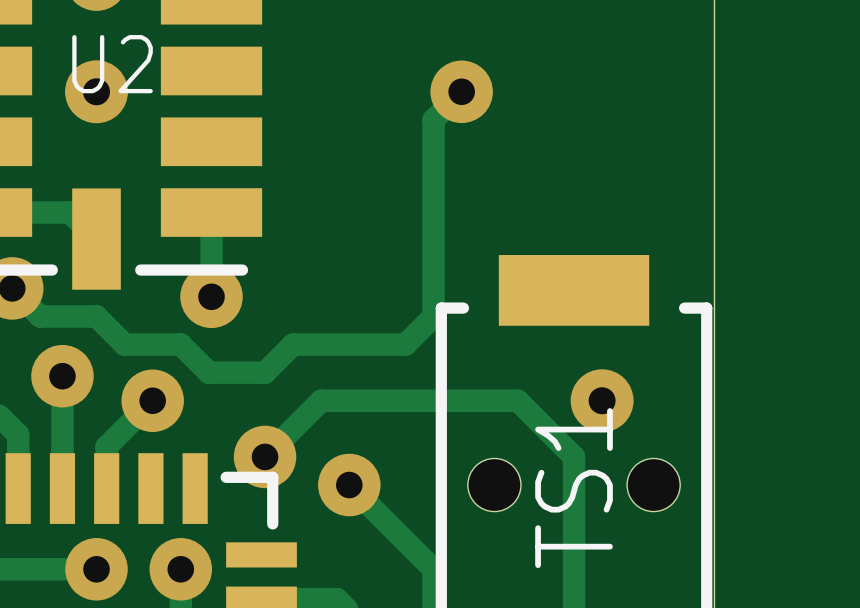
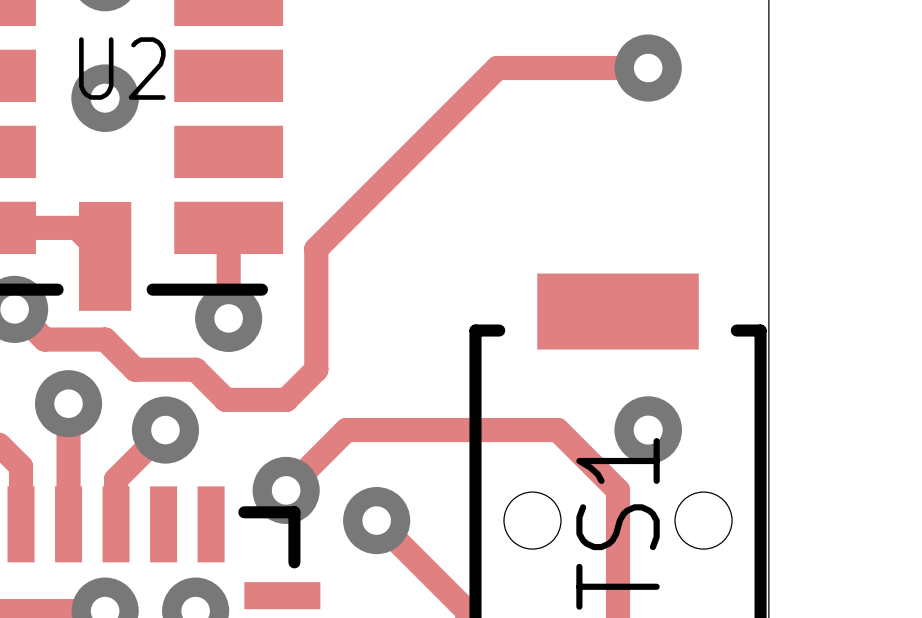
track: (461, 91) (433, 119) (433, 316) (405, 344) (293, 344) -> (648, 68) (497, 68) (316, 249) (316, 369)
via position: (461, 91) -> (648, 68)

